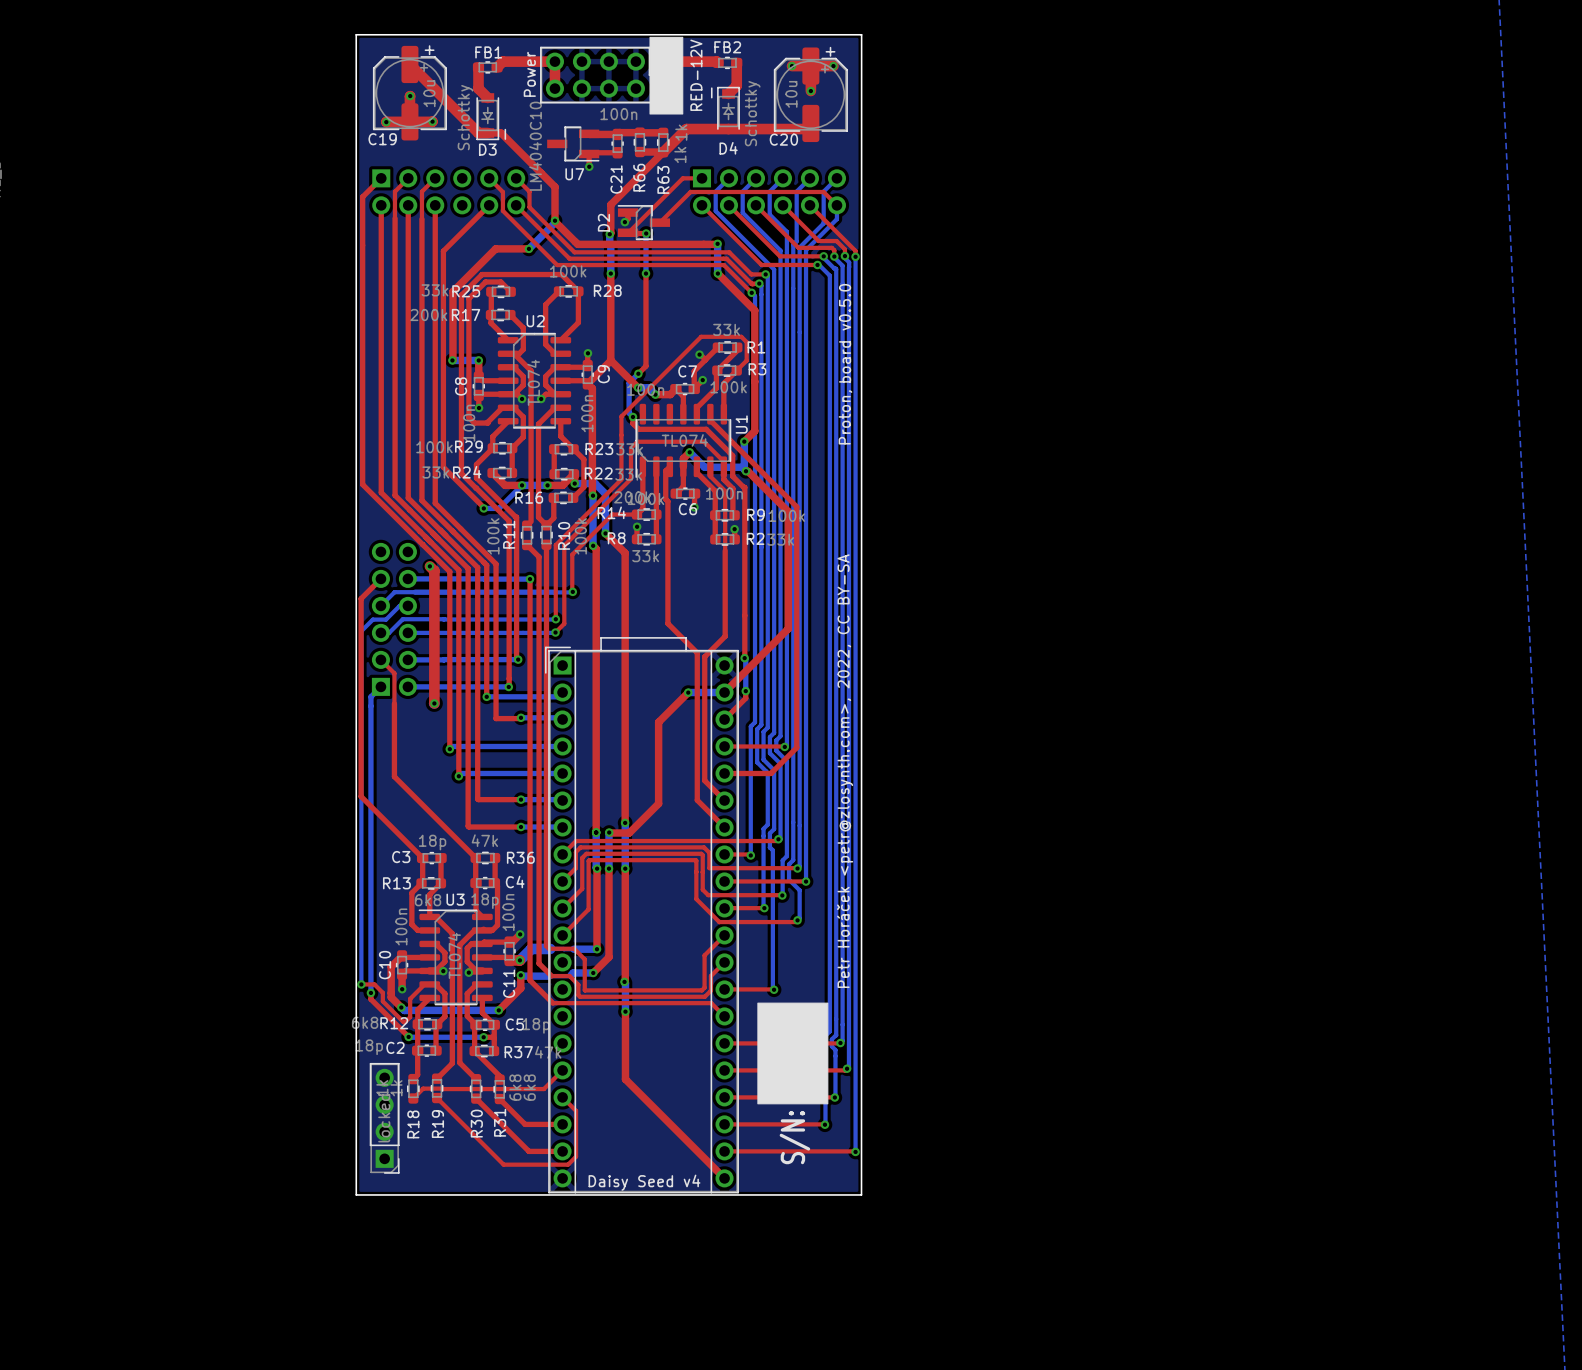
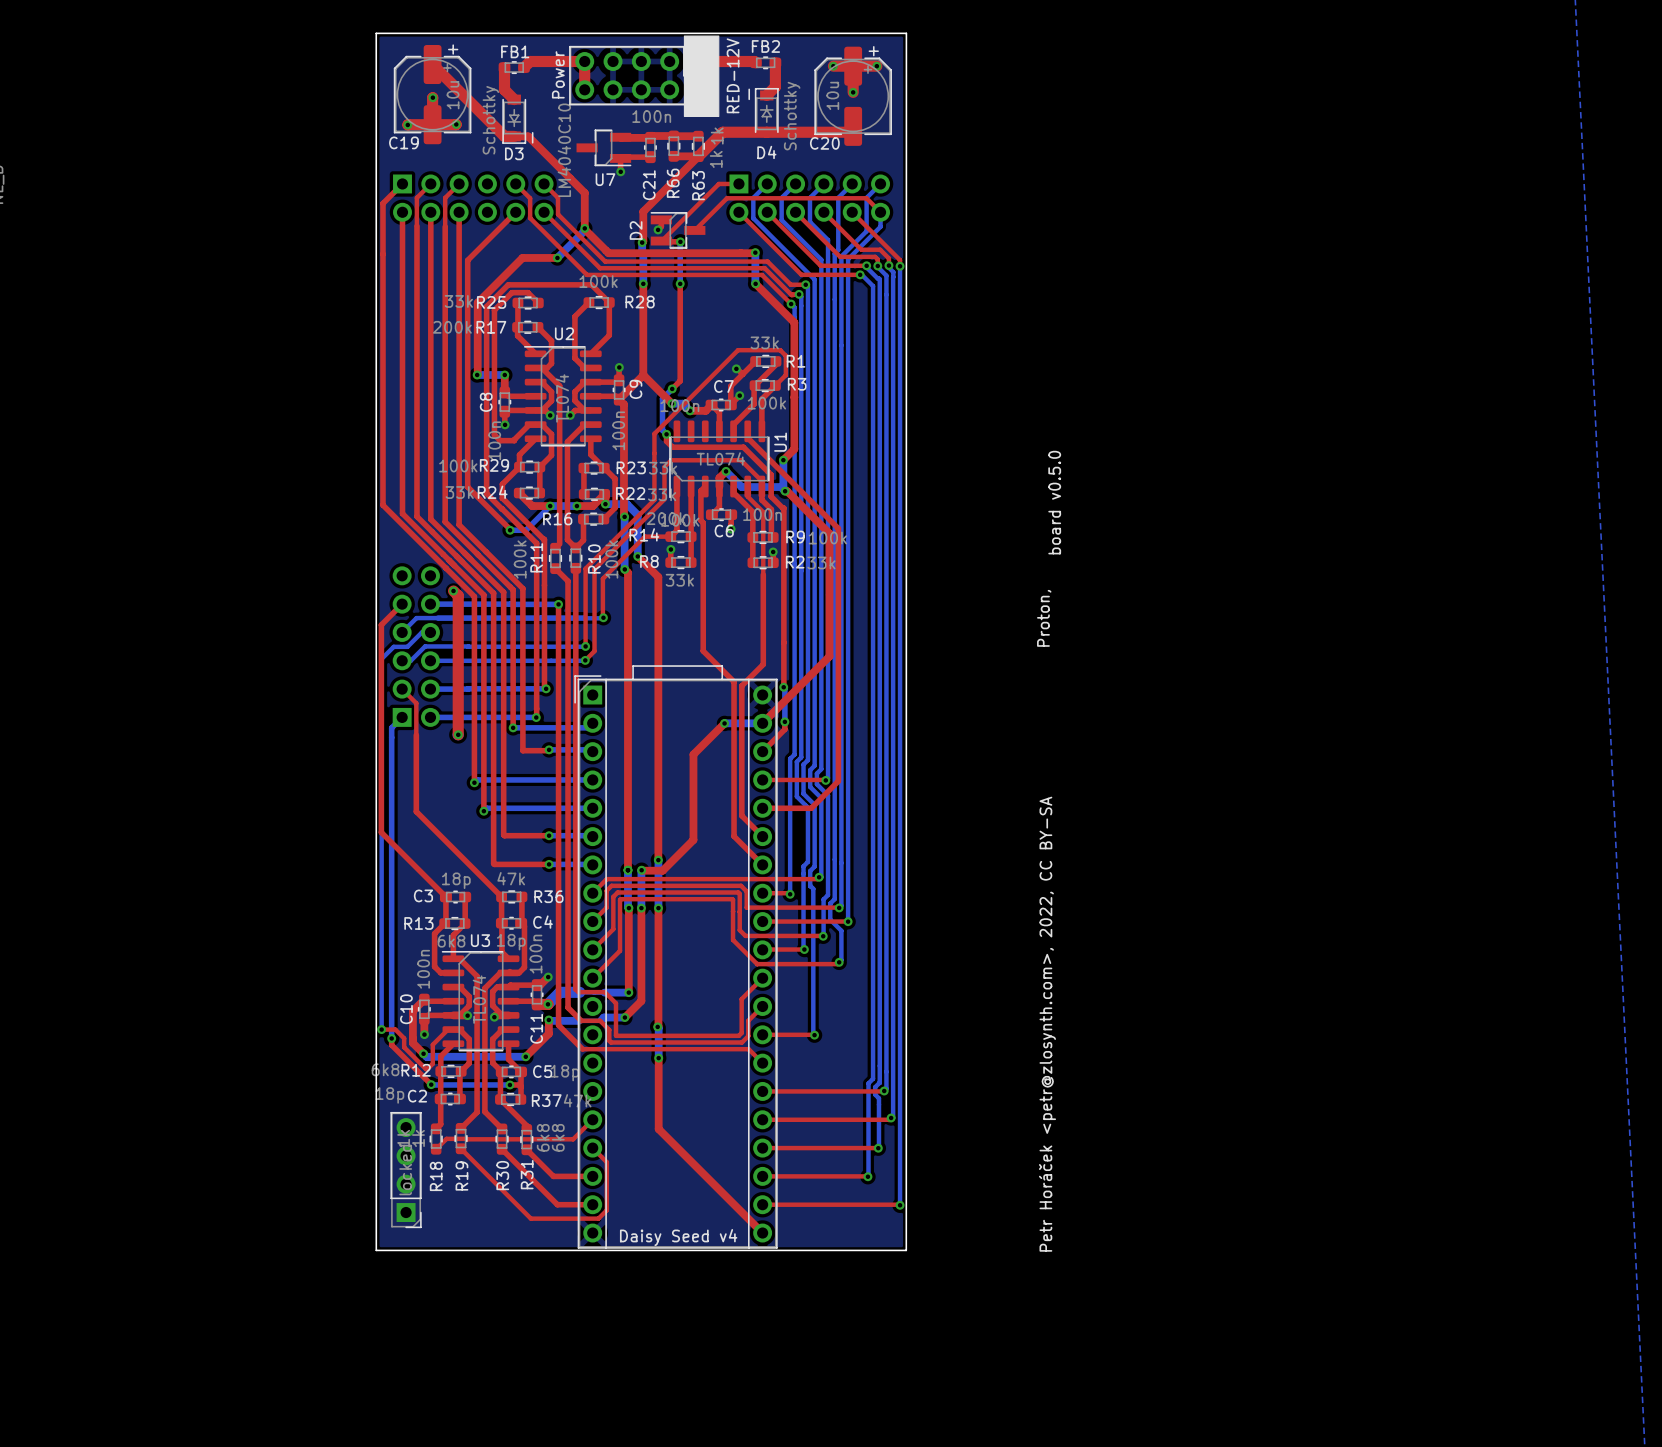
text position: board v0.5.0 (845, 333) -> board v0.5.0 (1054, 502)
text position: Proton, (845, 417) -> Proton, (1044, 618)
text position: Petr Horáček <petr@zlosynth.com>, 2022, CC BY-SA (845, 771) -> Petr Horáček <petr@zlosynth.com>, 2022, CC BY-SA (1047, 1024)
drawing: [757, 1002, 829, 1105] -> none
text: S/N: (794, 1137) -> none

